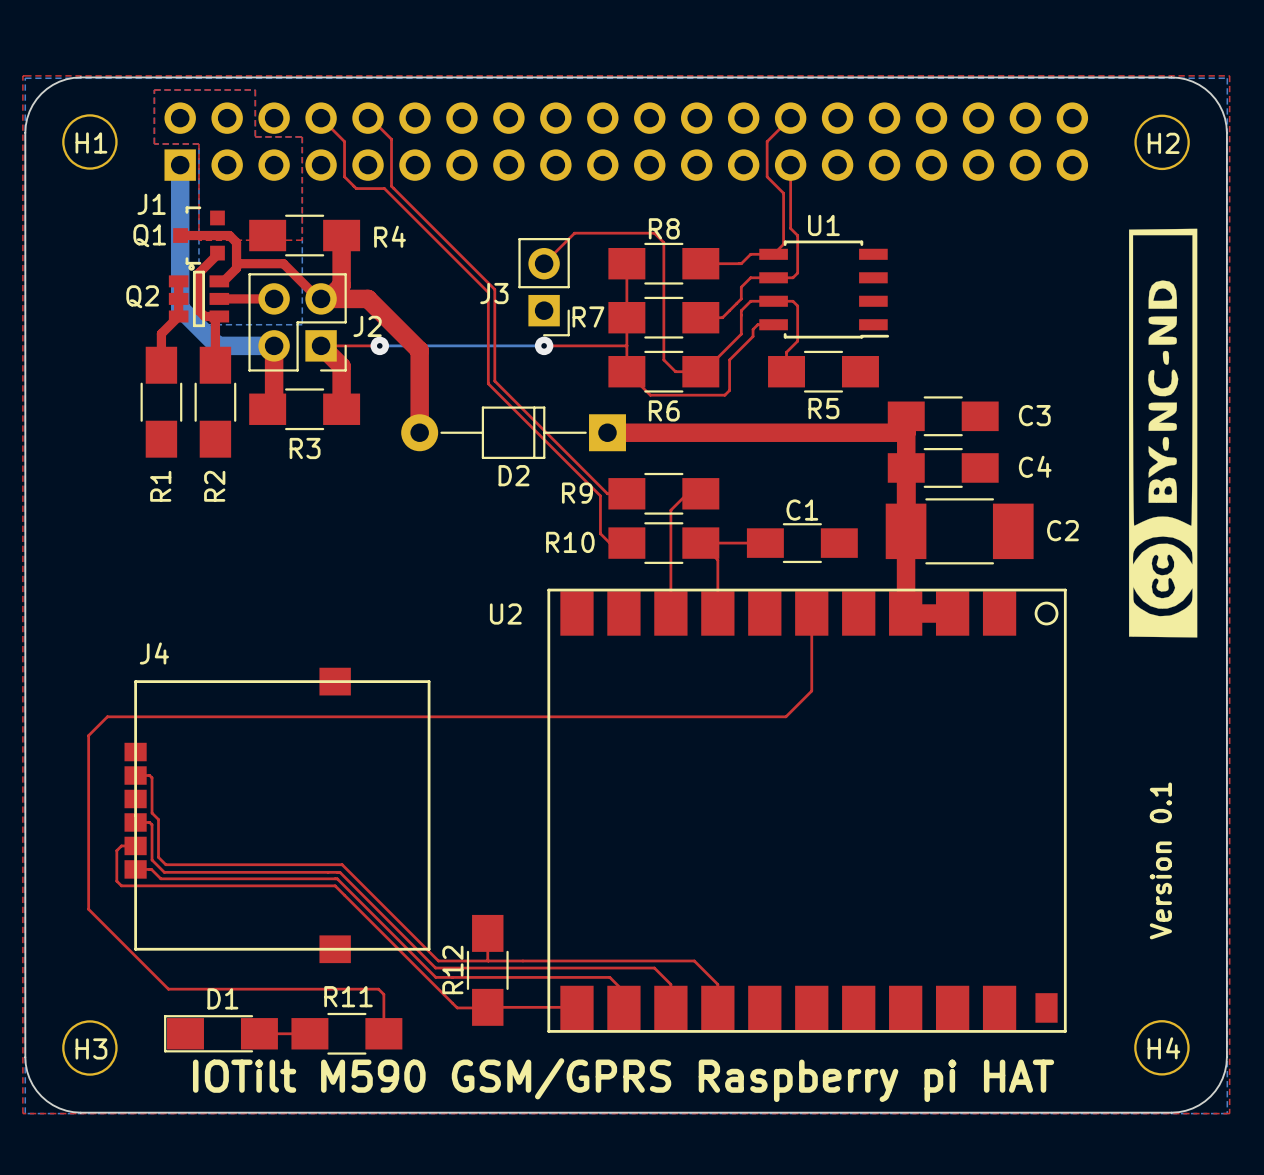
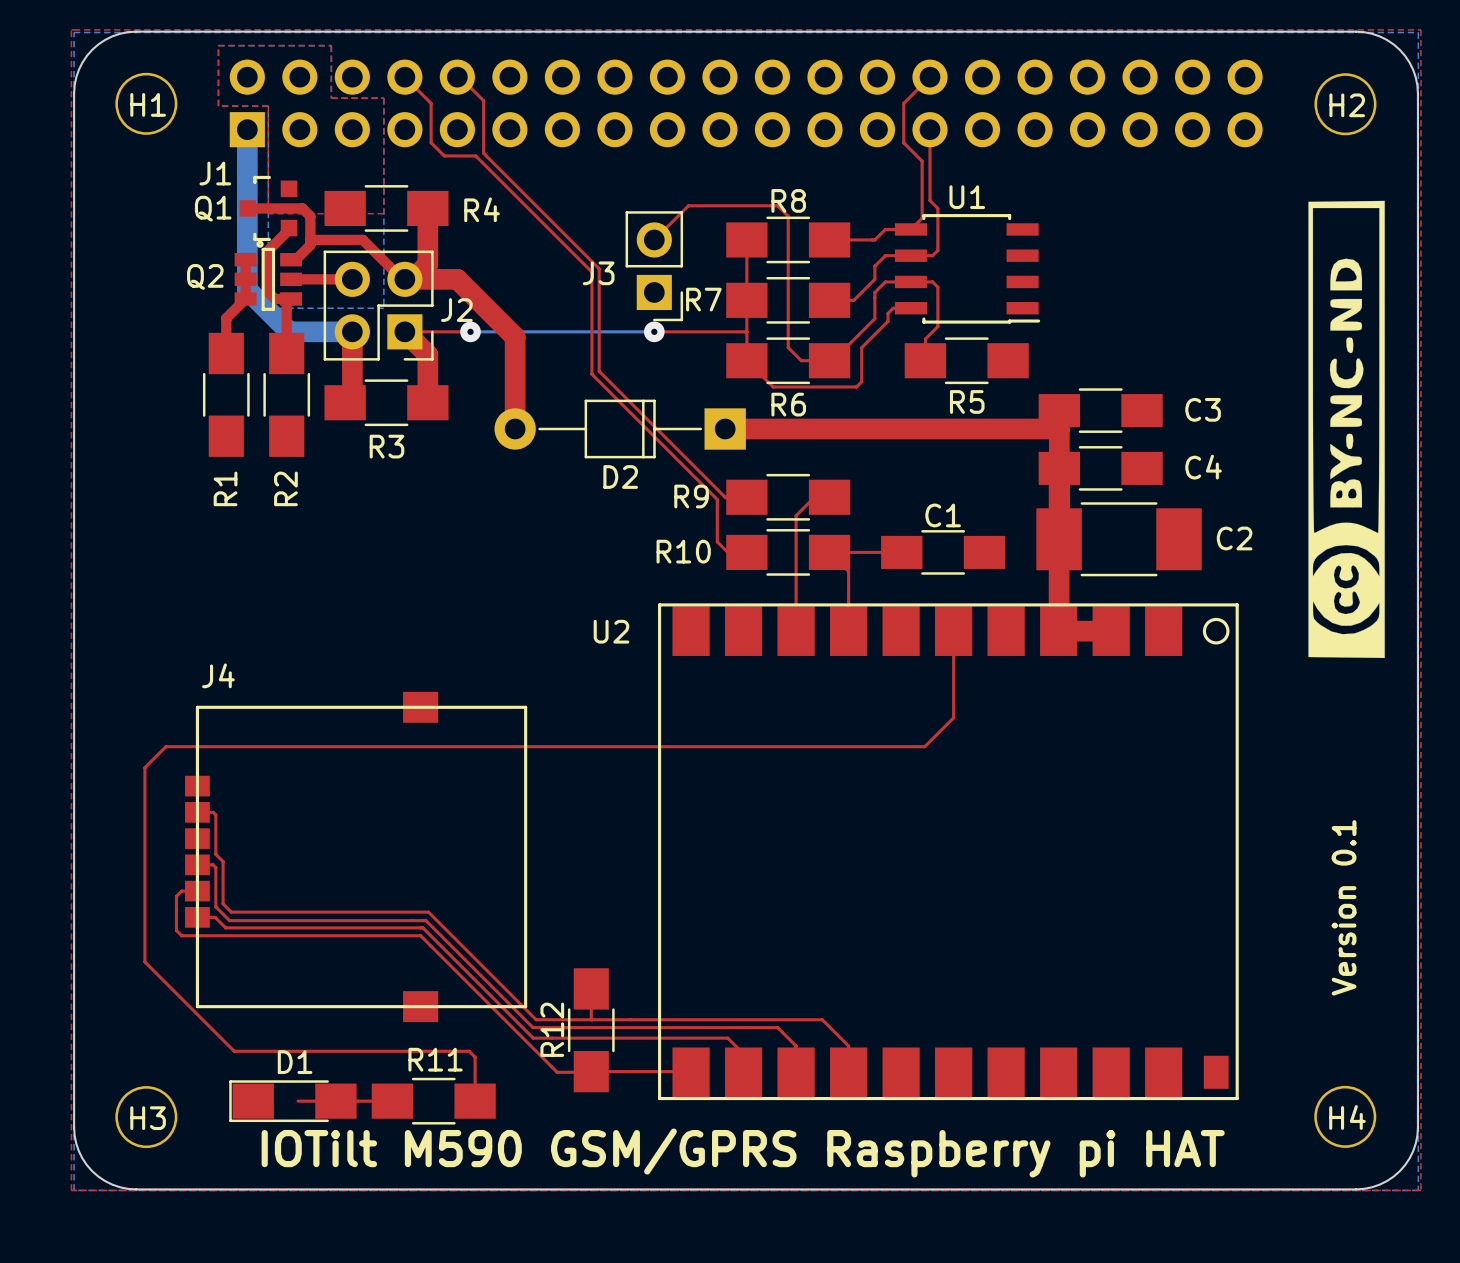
top track: none -> (298, 1101) (335, 1101)

